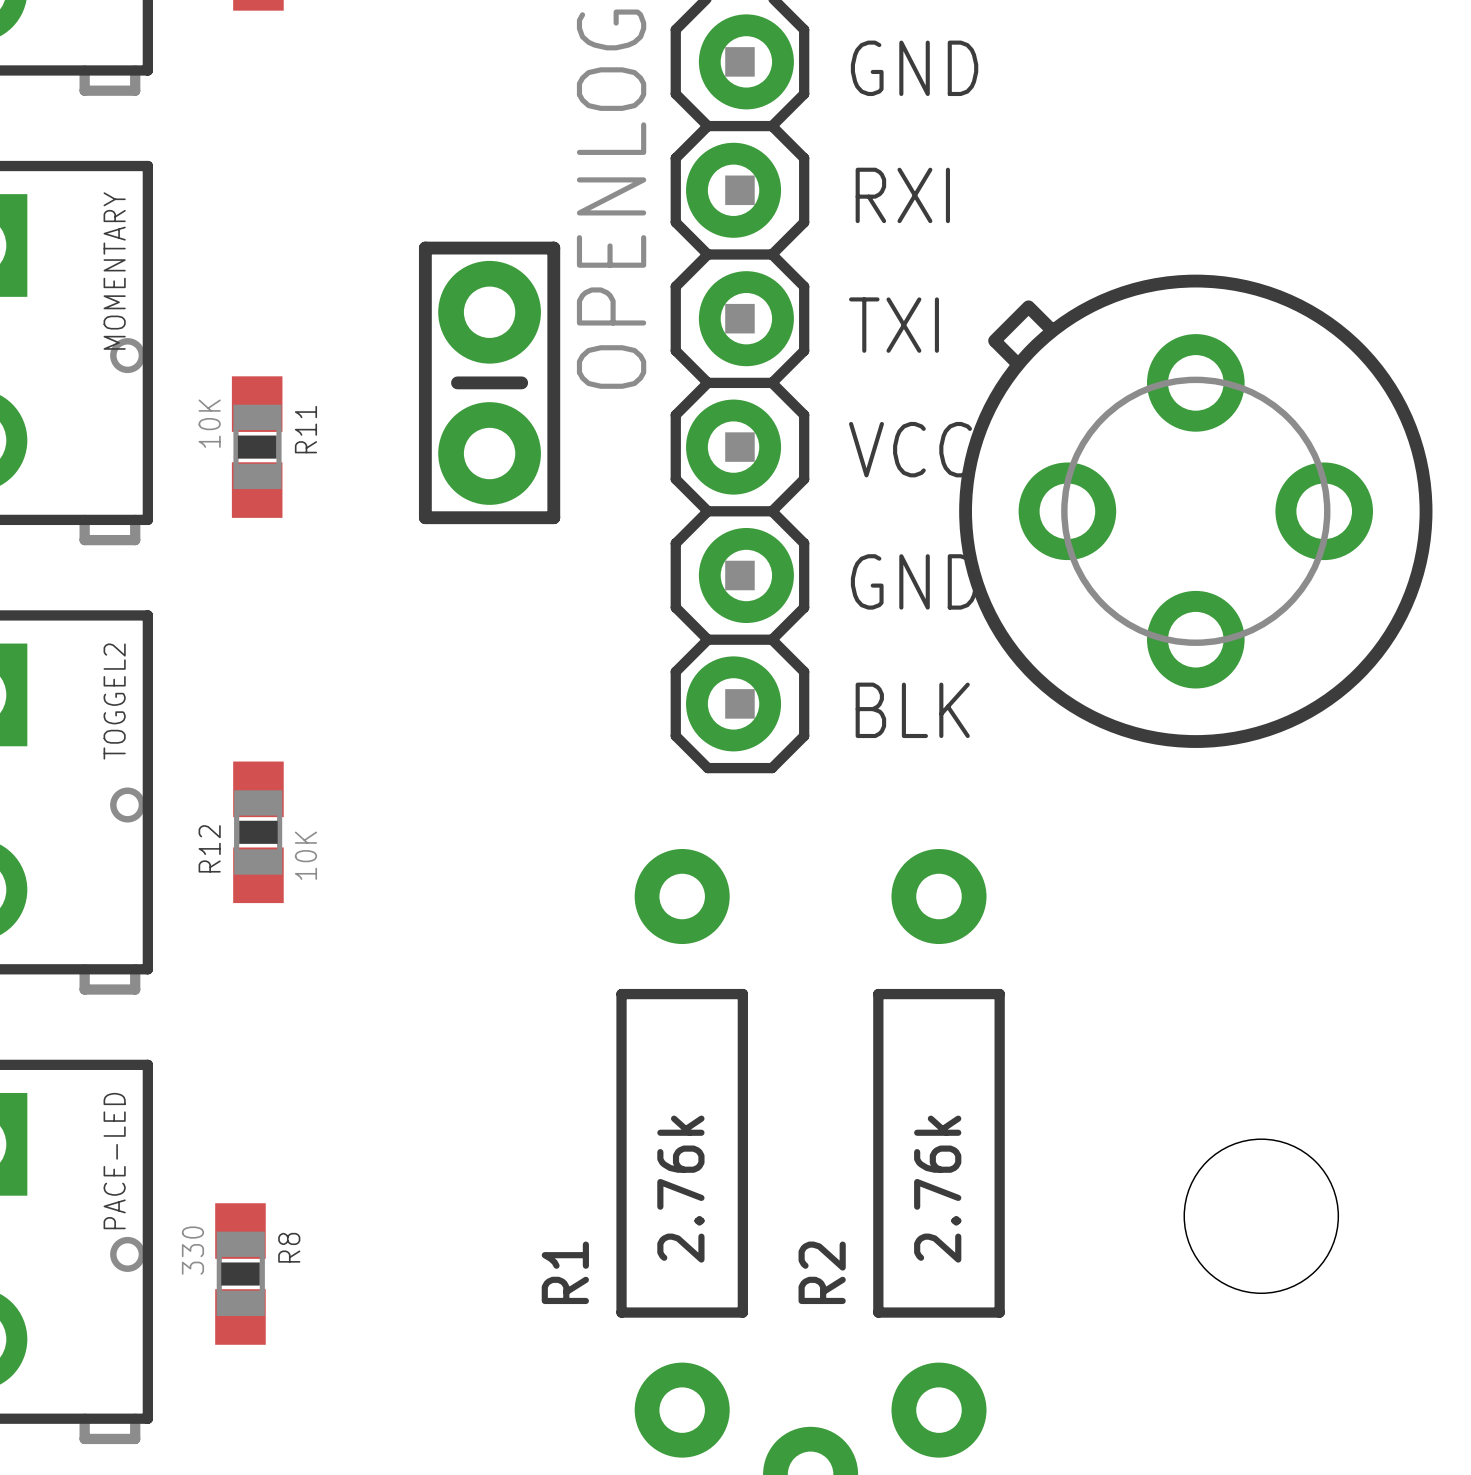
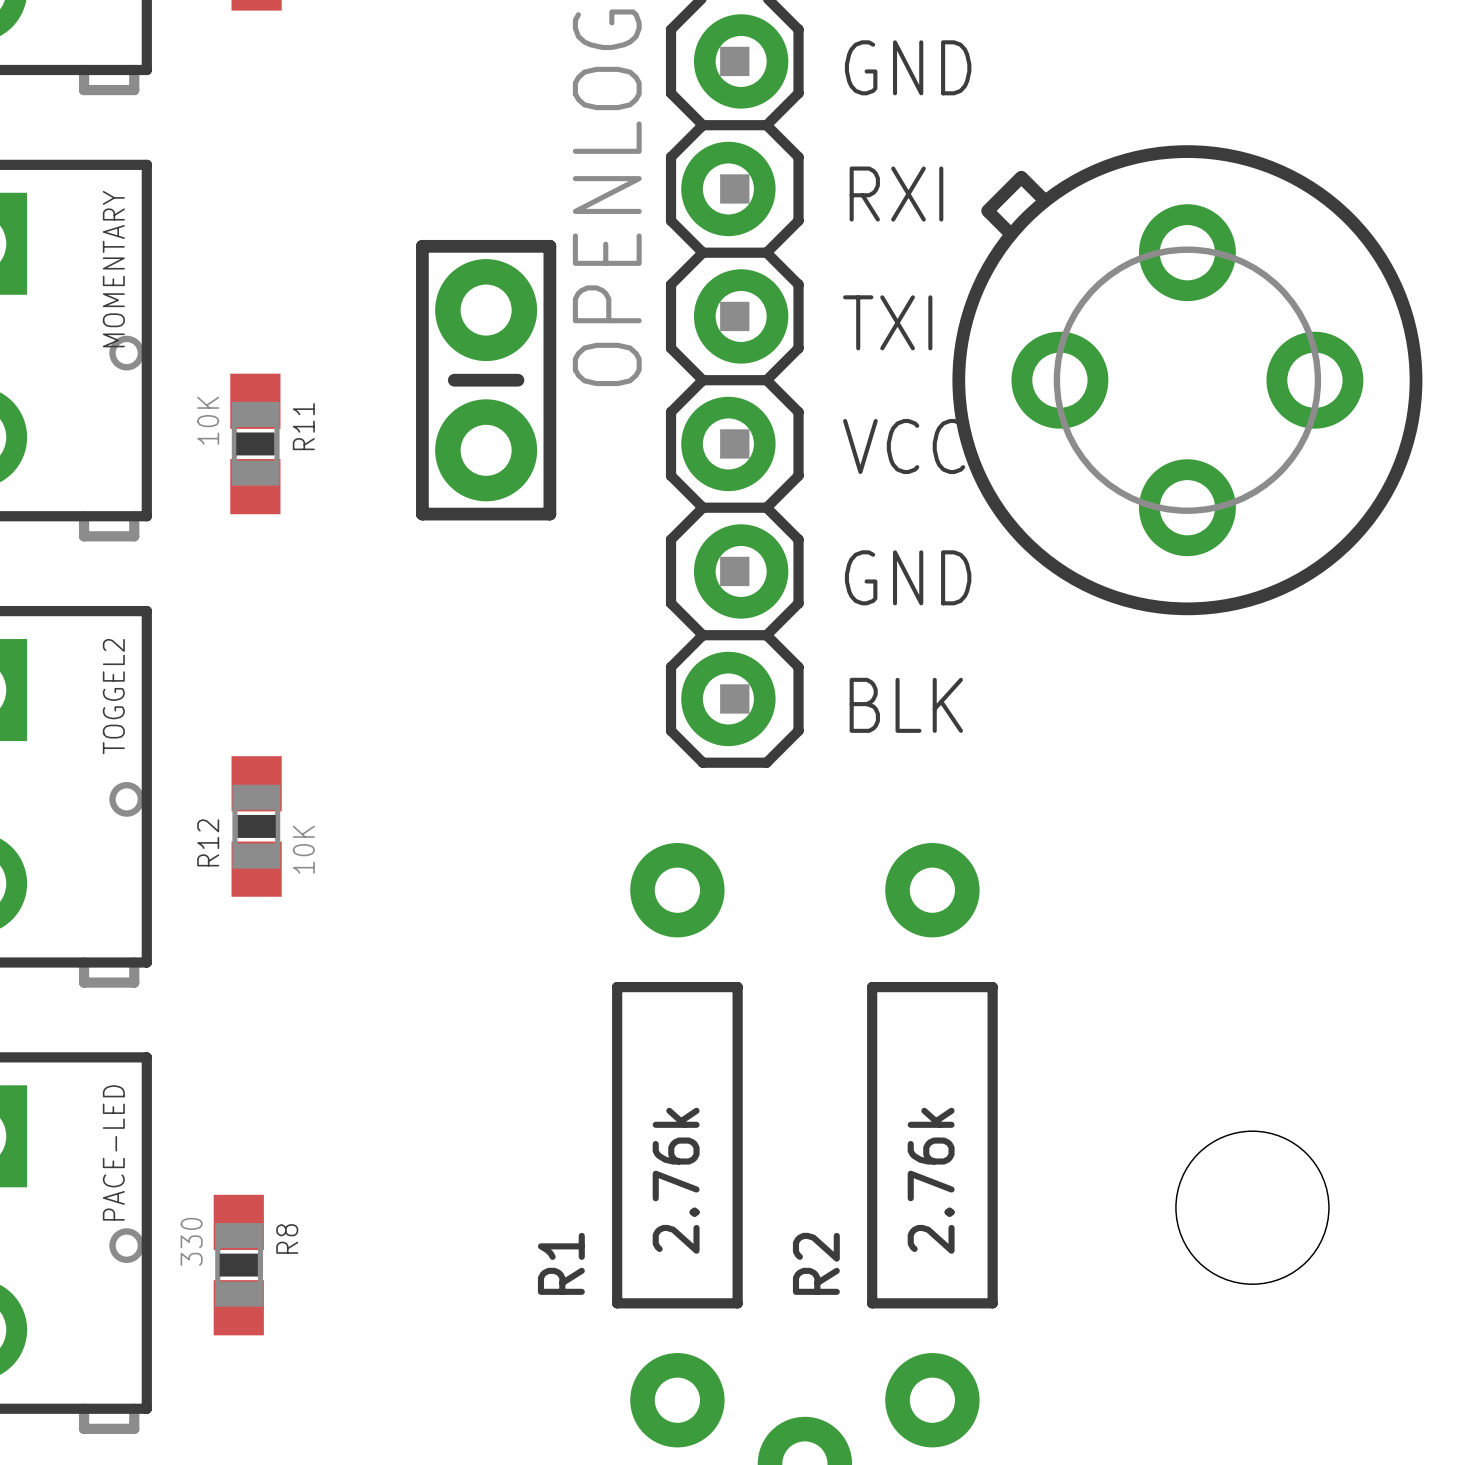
part position: (1195, 511) -> (1187, 380)

